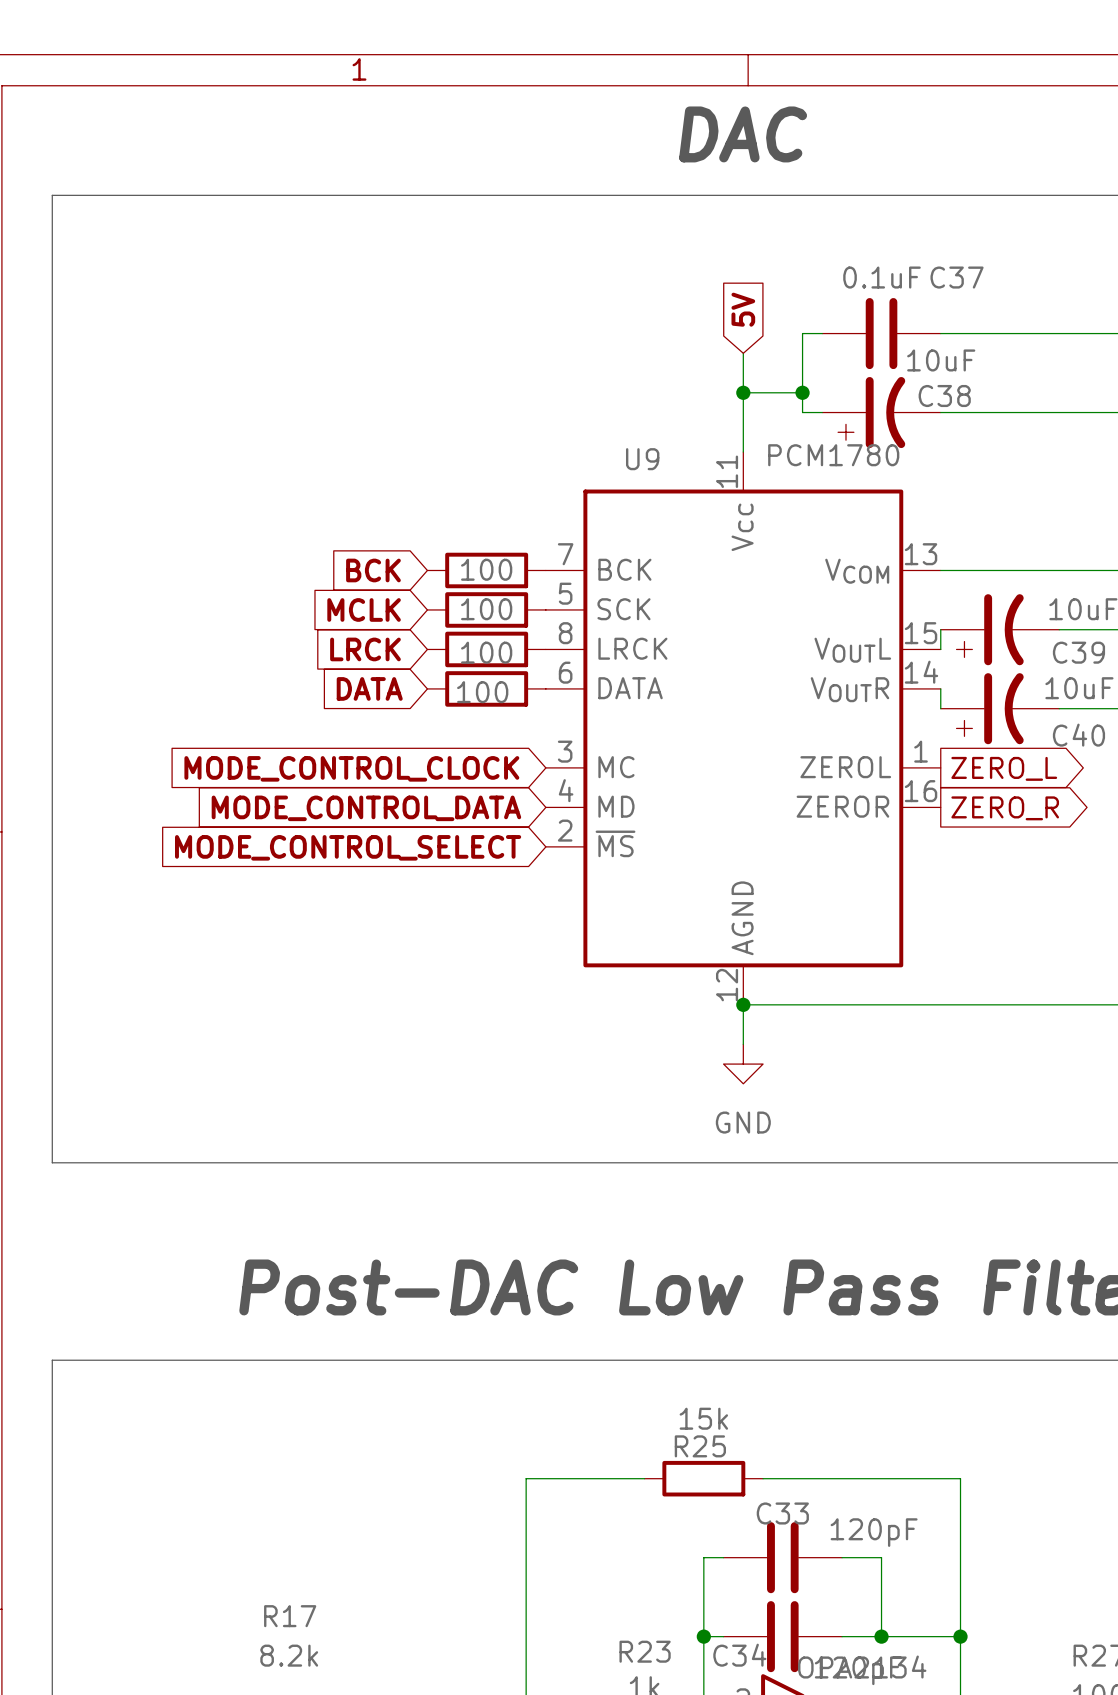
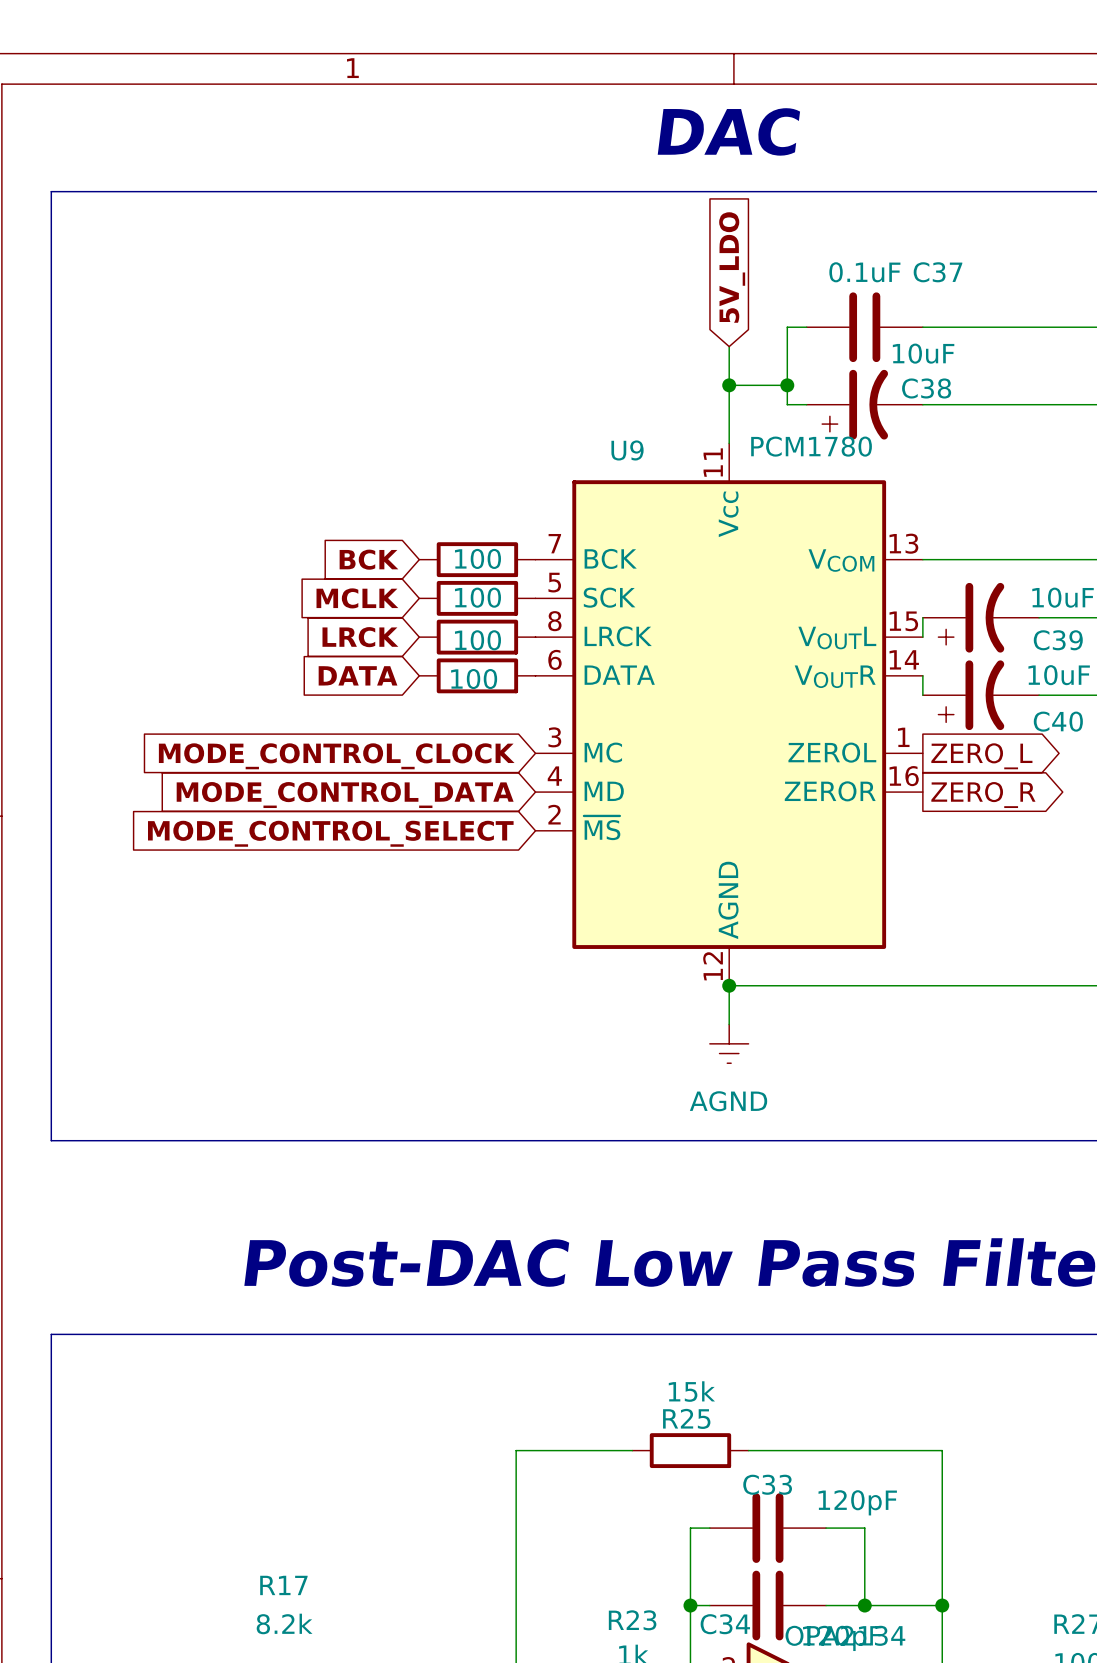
global label: 5V (743, 309) -> 5V_LDO (732, 267)
power symbol: GND (743, 1064) -> AGND (729, 1043)

